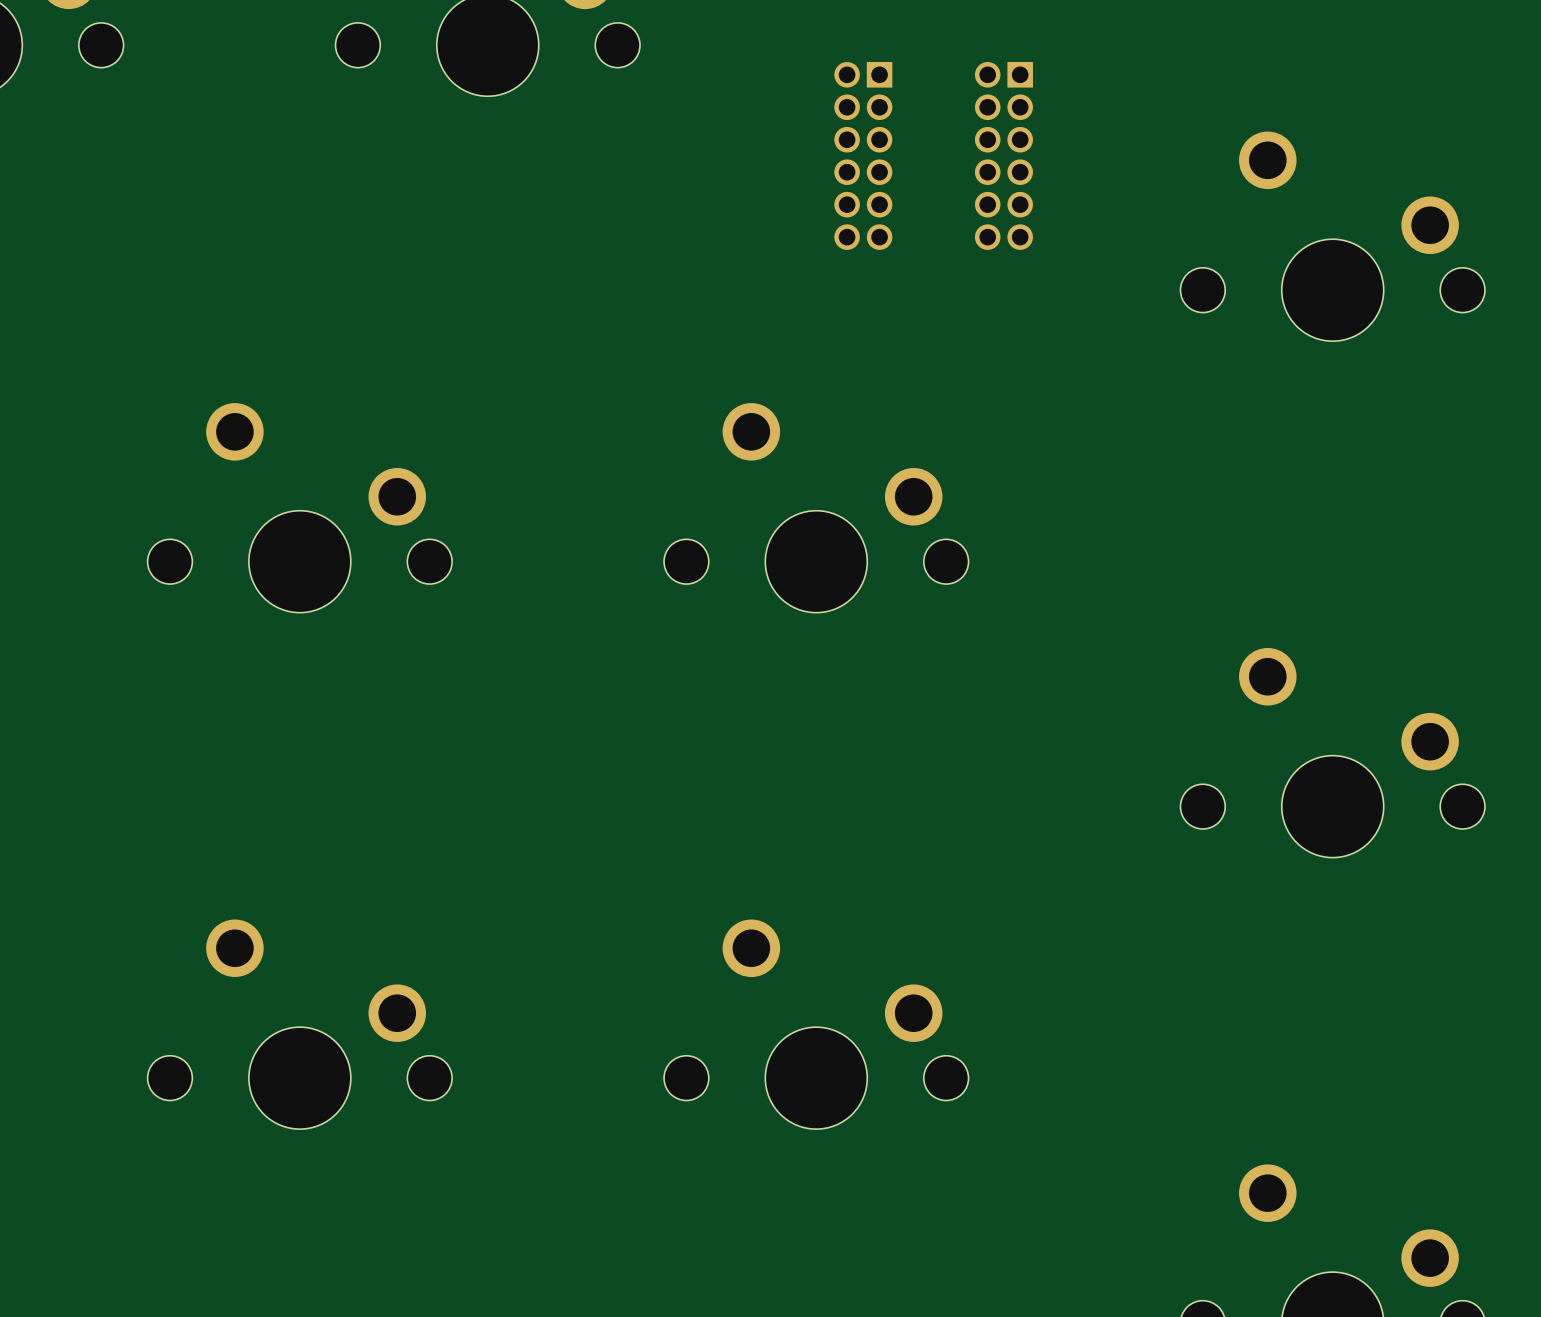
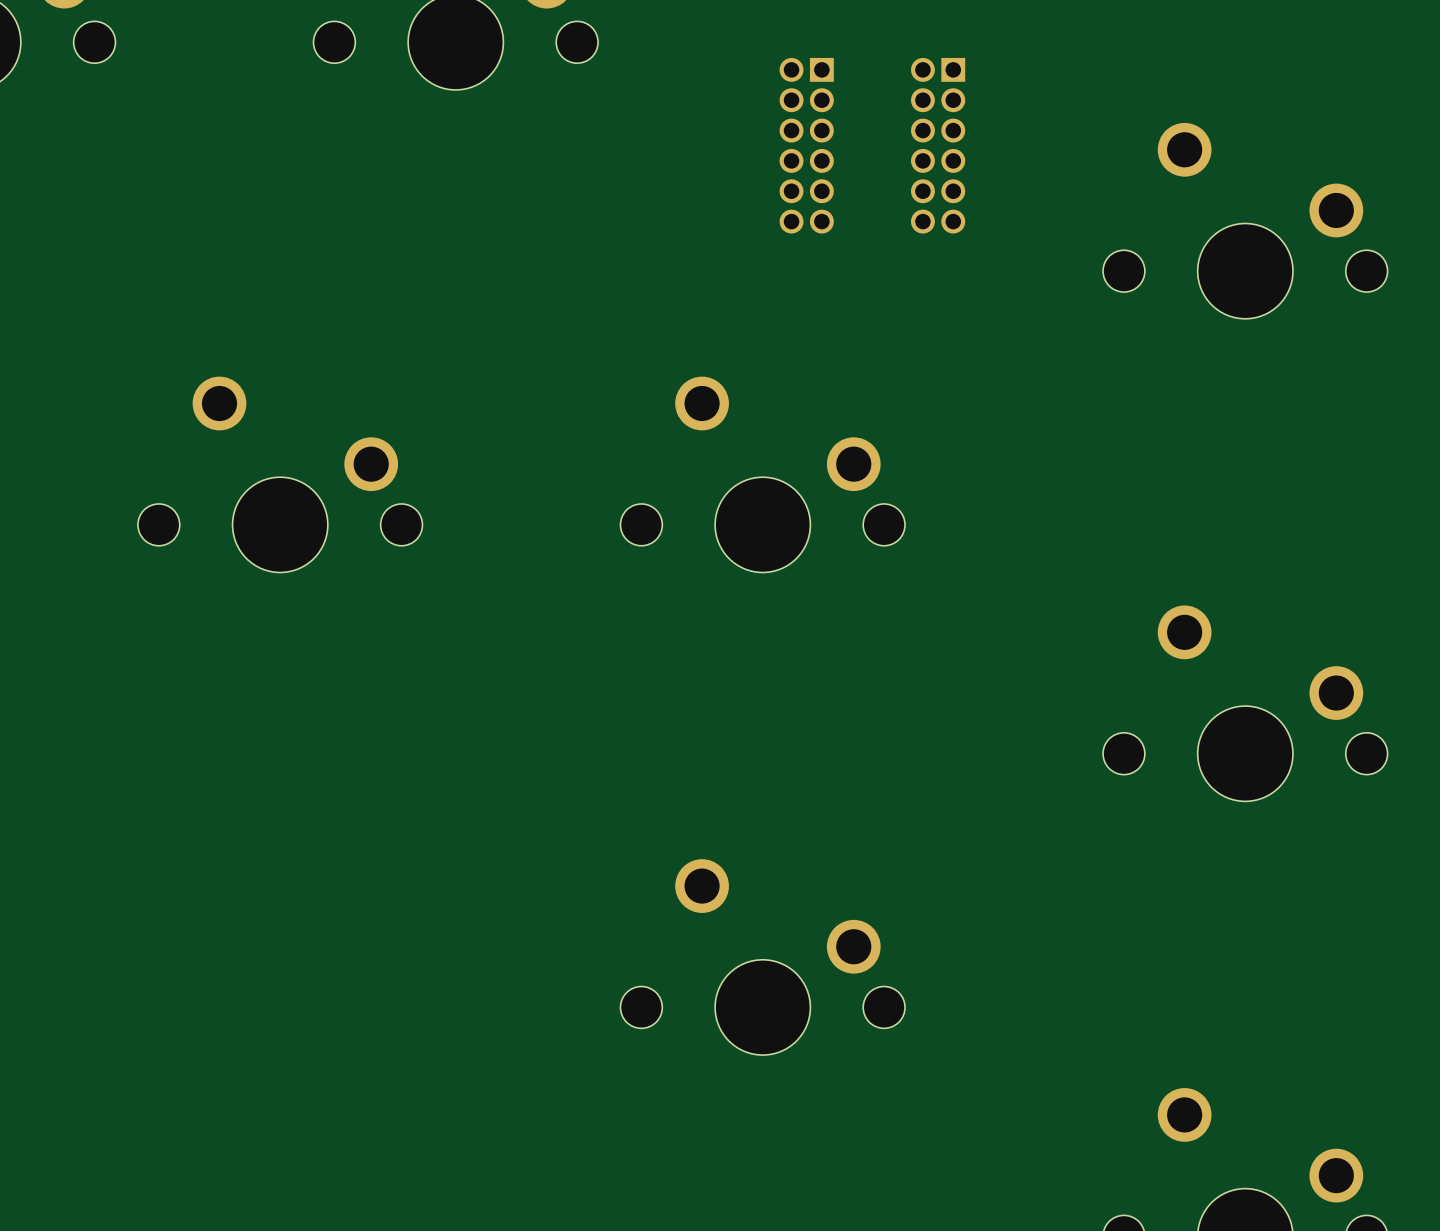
part: (299, 1024) -> none

